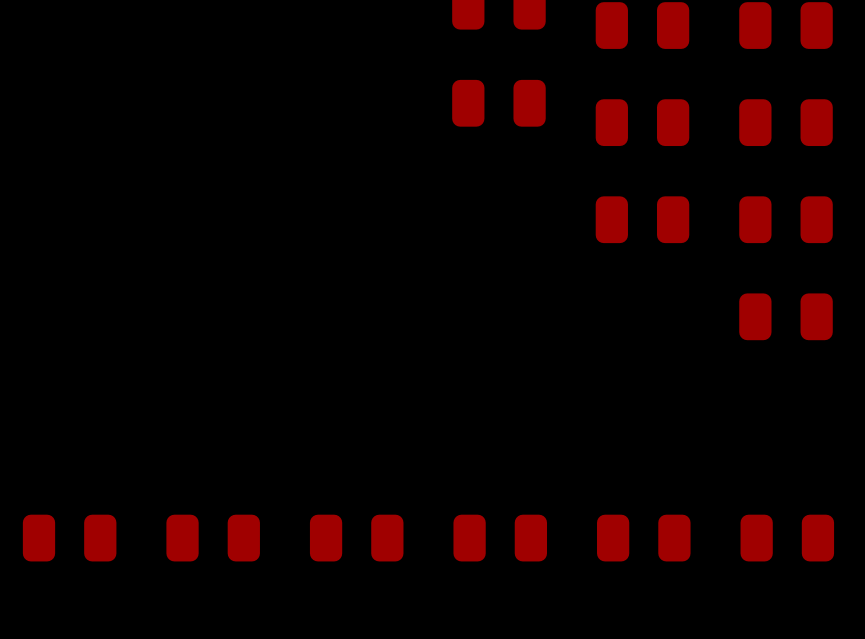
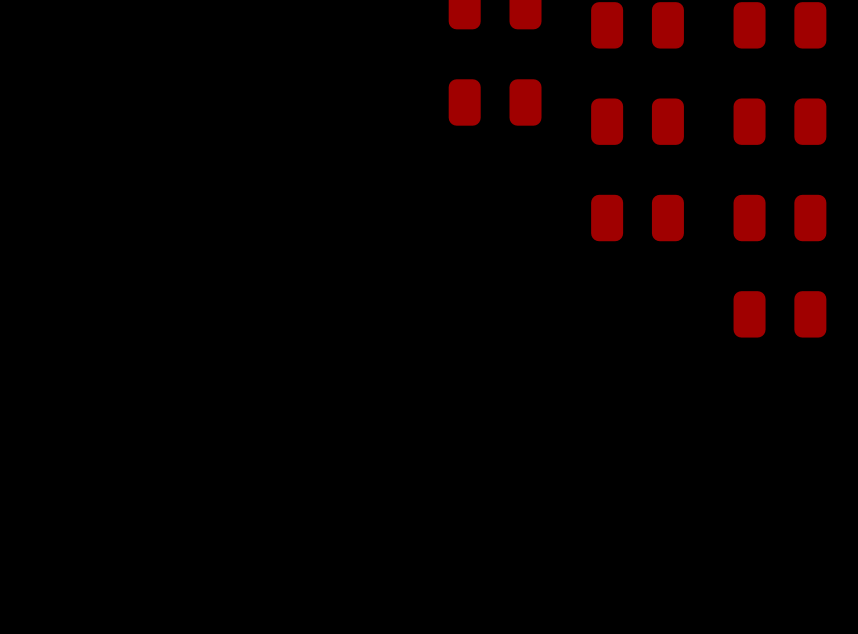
part: (69, 538) -> none
part: (213, 538) -> none
part: (356, 538) -> none
part: (500, 538) -> none
part: (643, 538) -> none
part: (787, 538) -> none

